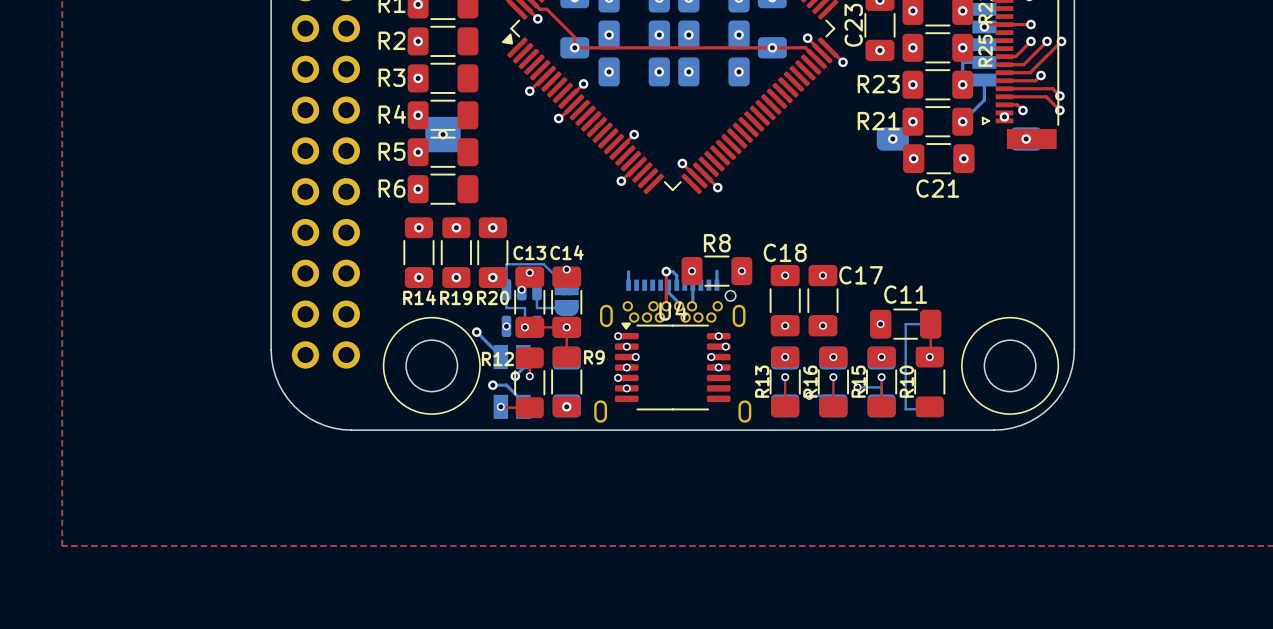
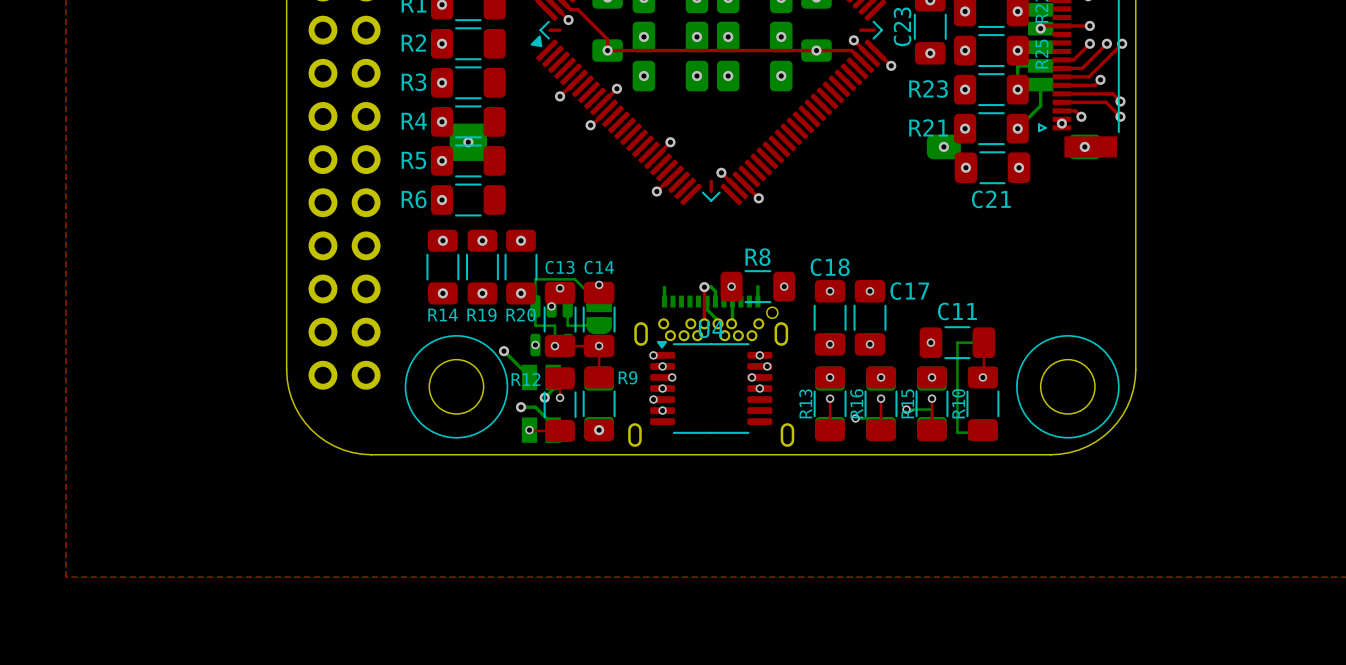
top track: none -> (549, 30) (560, 30)
top track: none -> (860, 30) (874, 30)
top track: none -> (711, 181) (711, 191)

